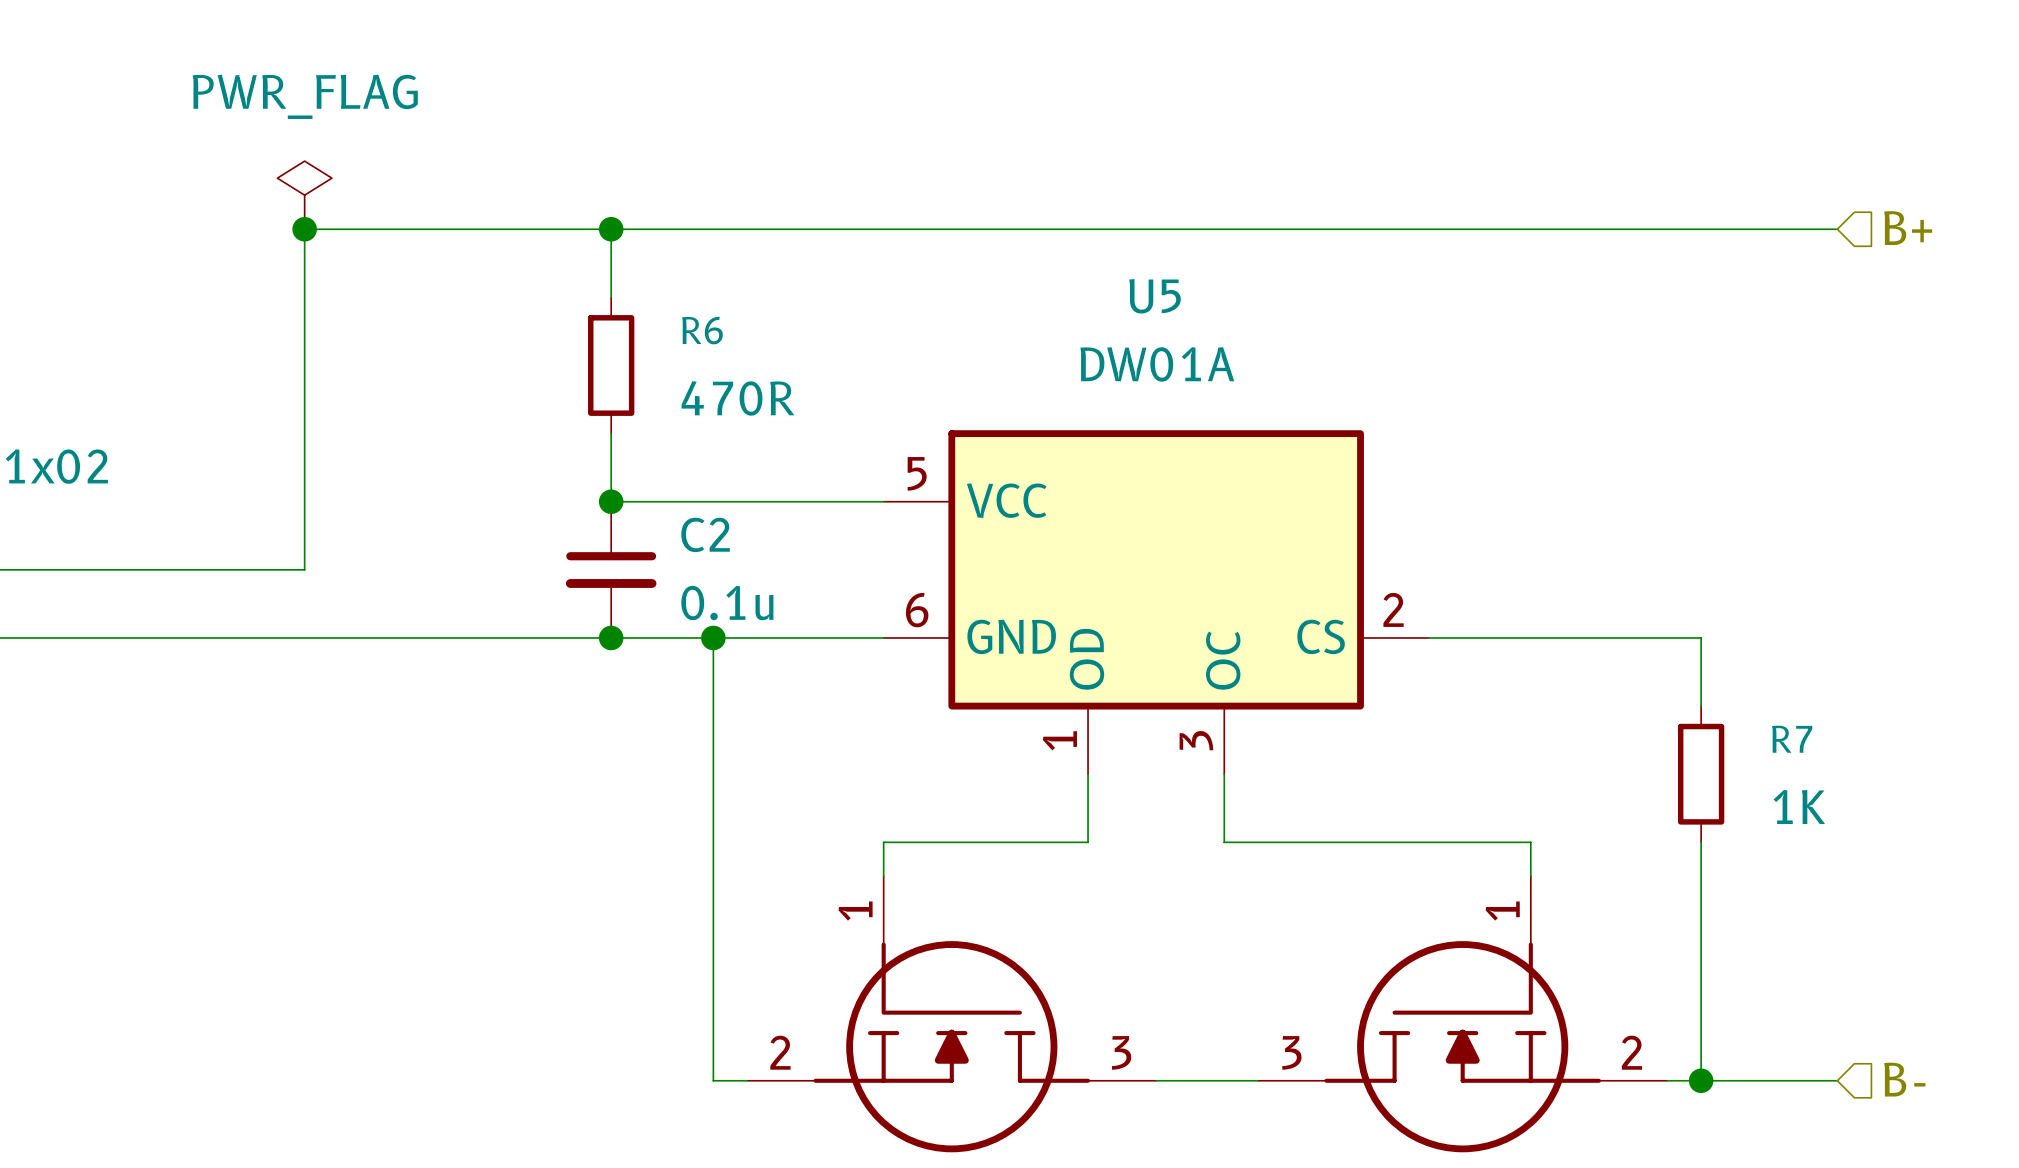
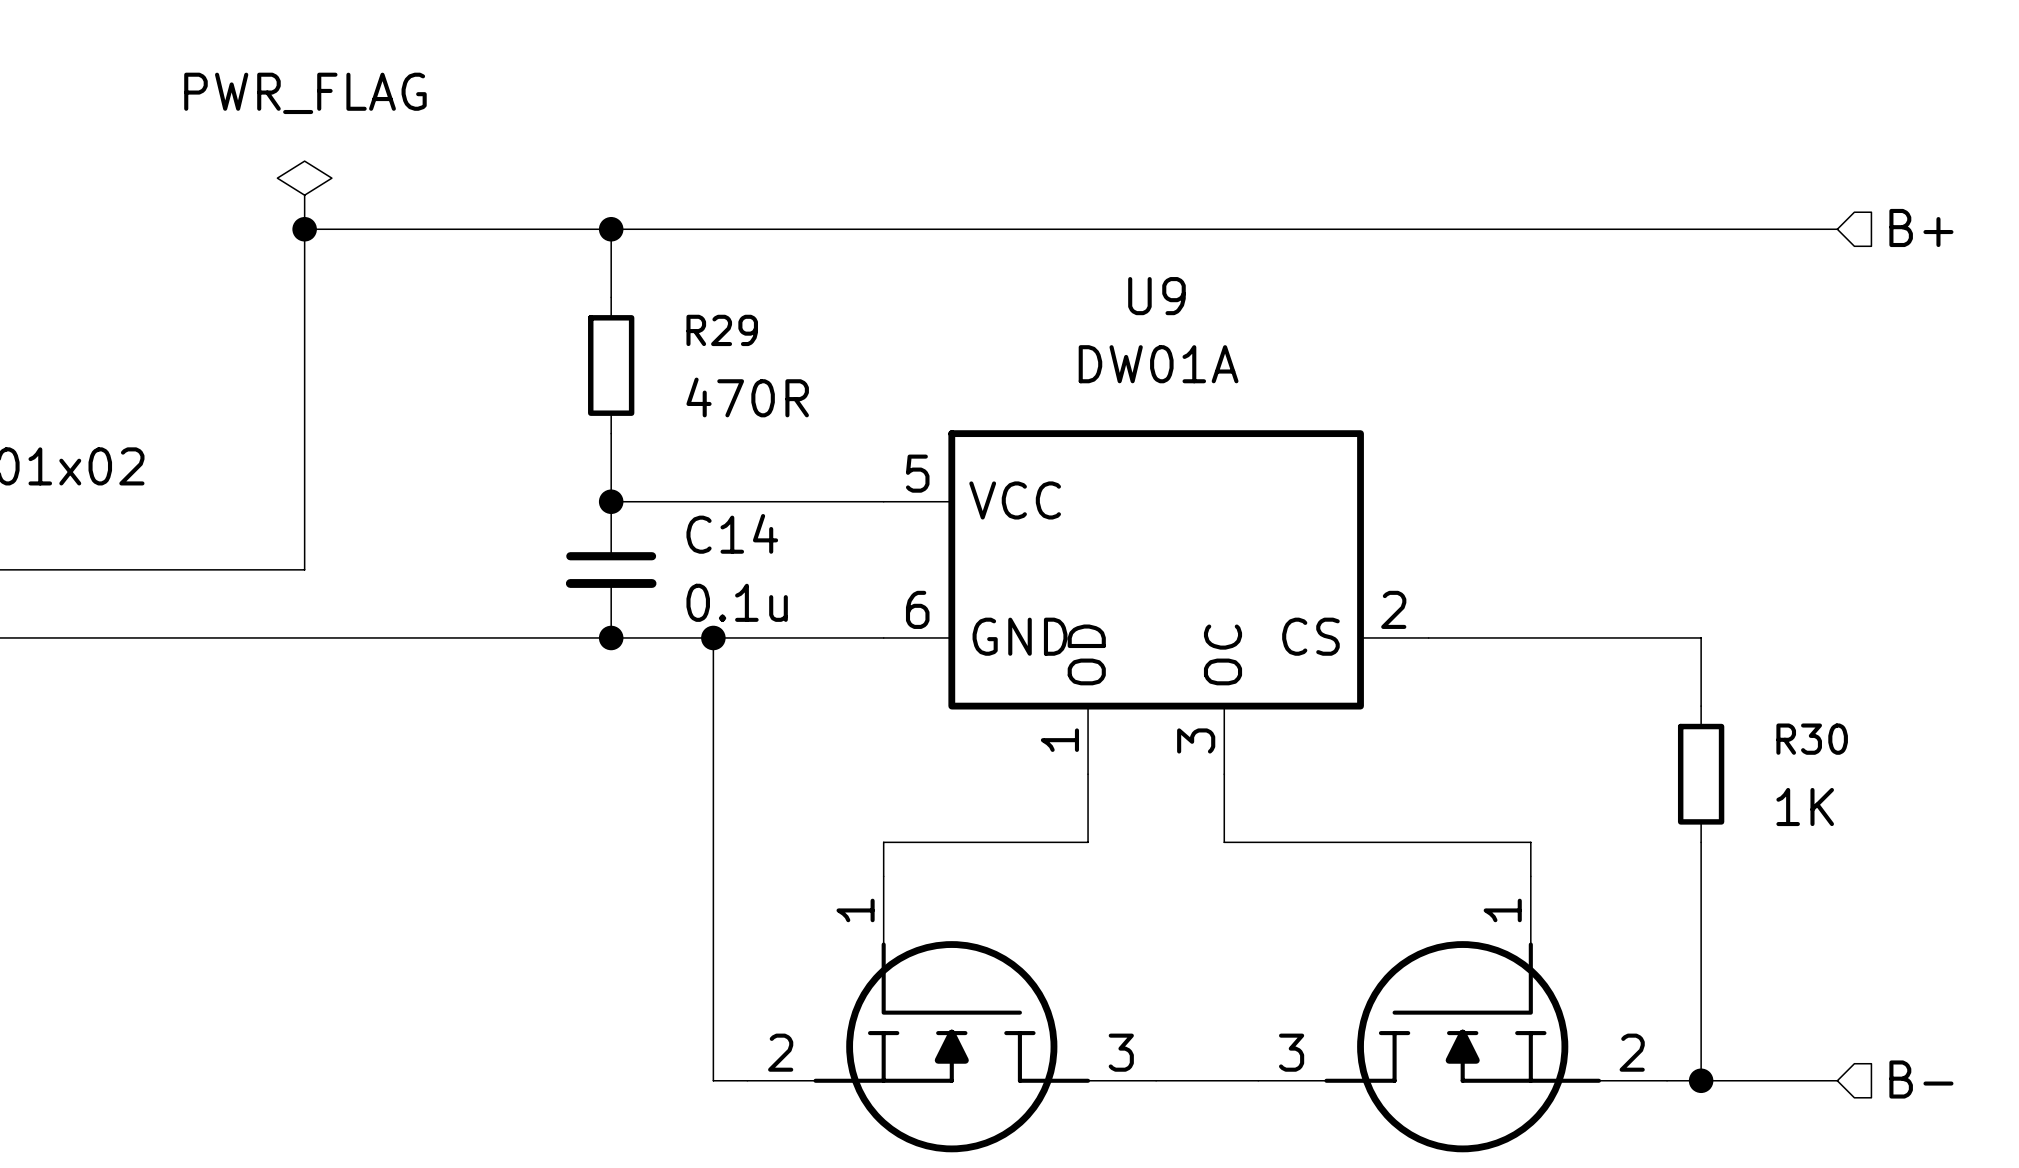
U5 name: U5 (1155, 296) -> U9 (1156, 296)
R6 name: R6 (702, 330) -> R29 (722, 330)
C2 name: C2 (705, 534) -> C14 (732, 533)
R7 name: R7 (1792, 739) -> R30 (1812, 739)

